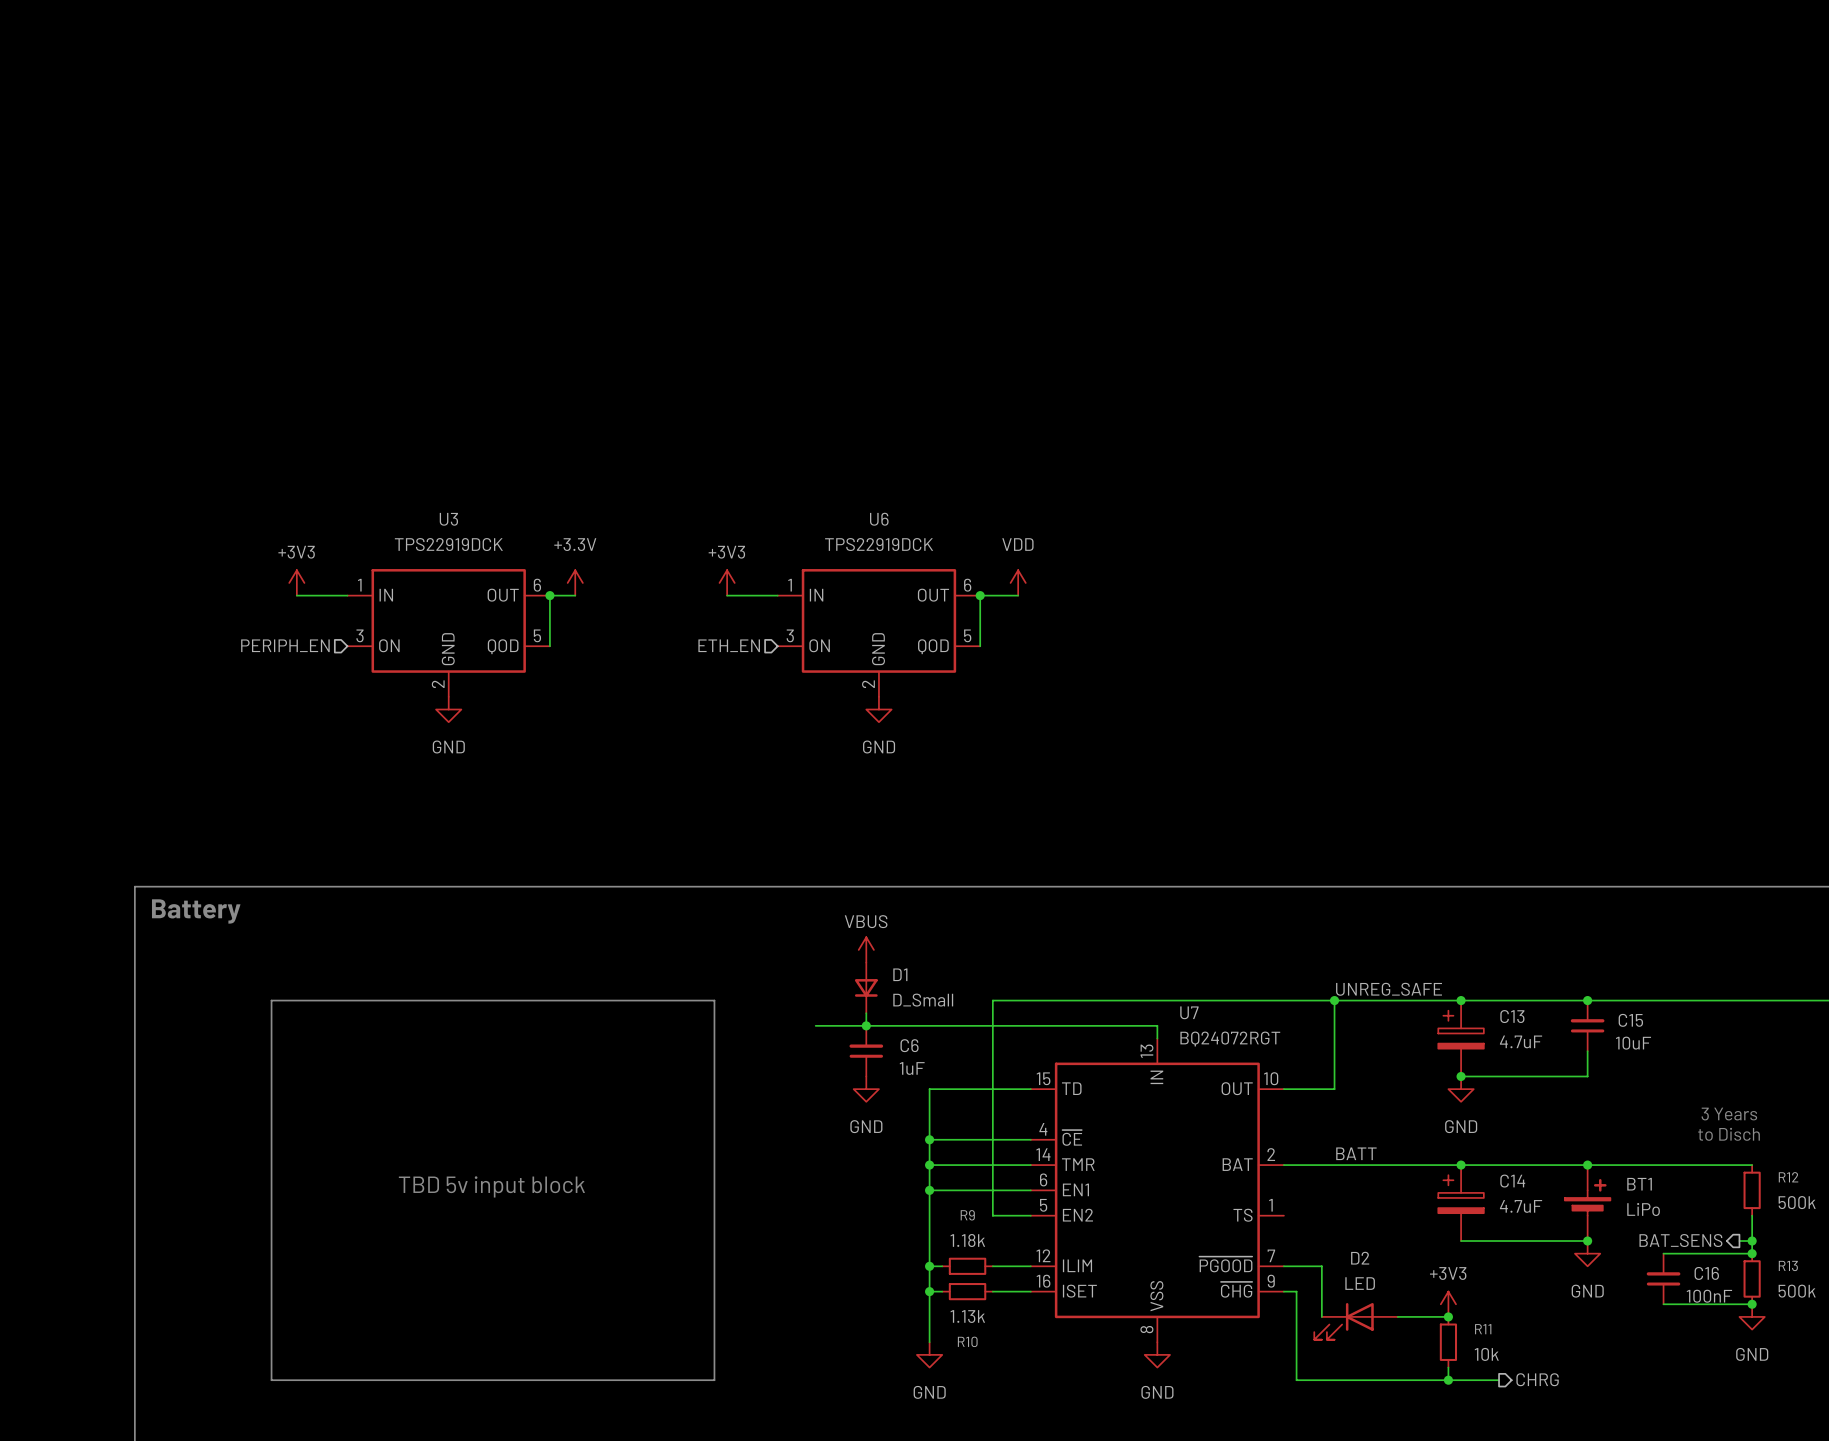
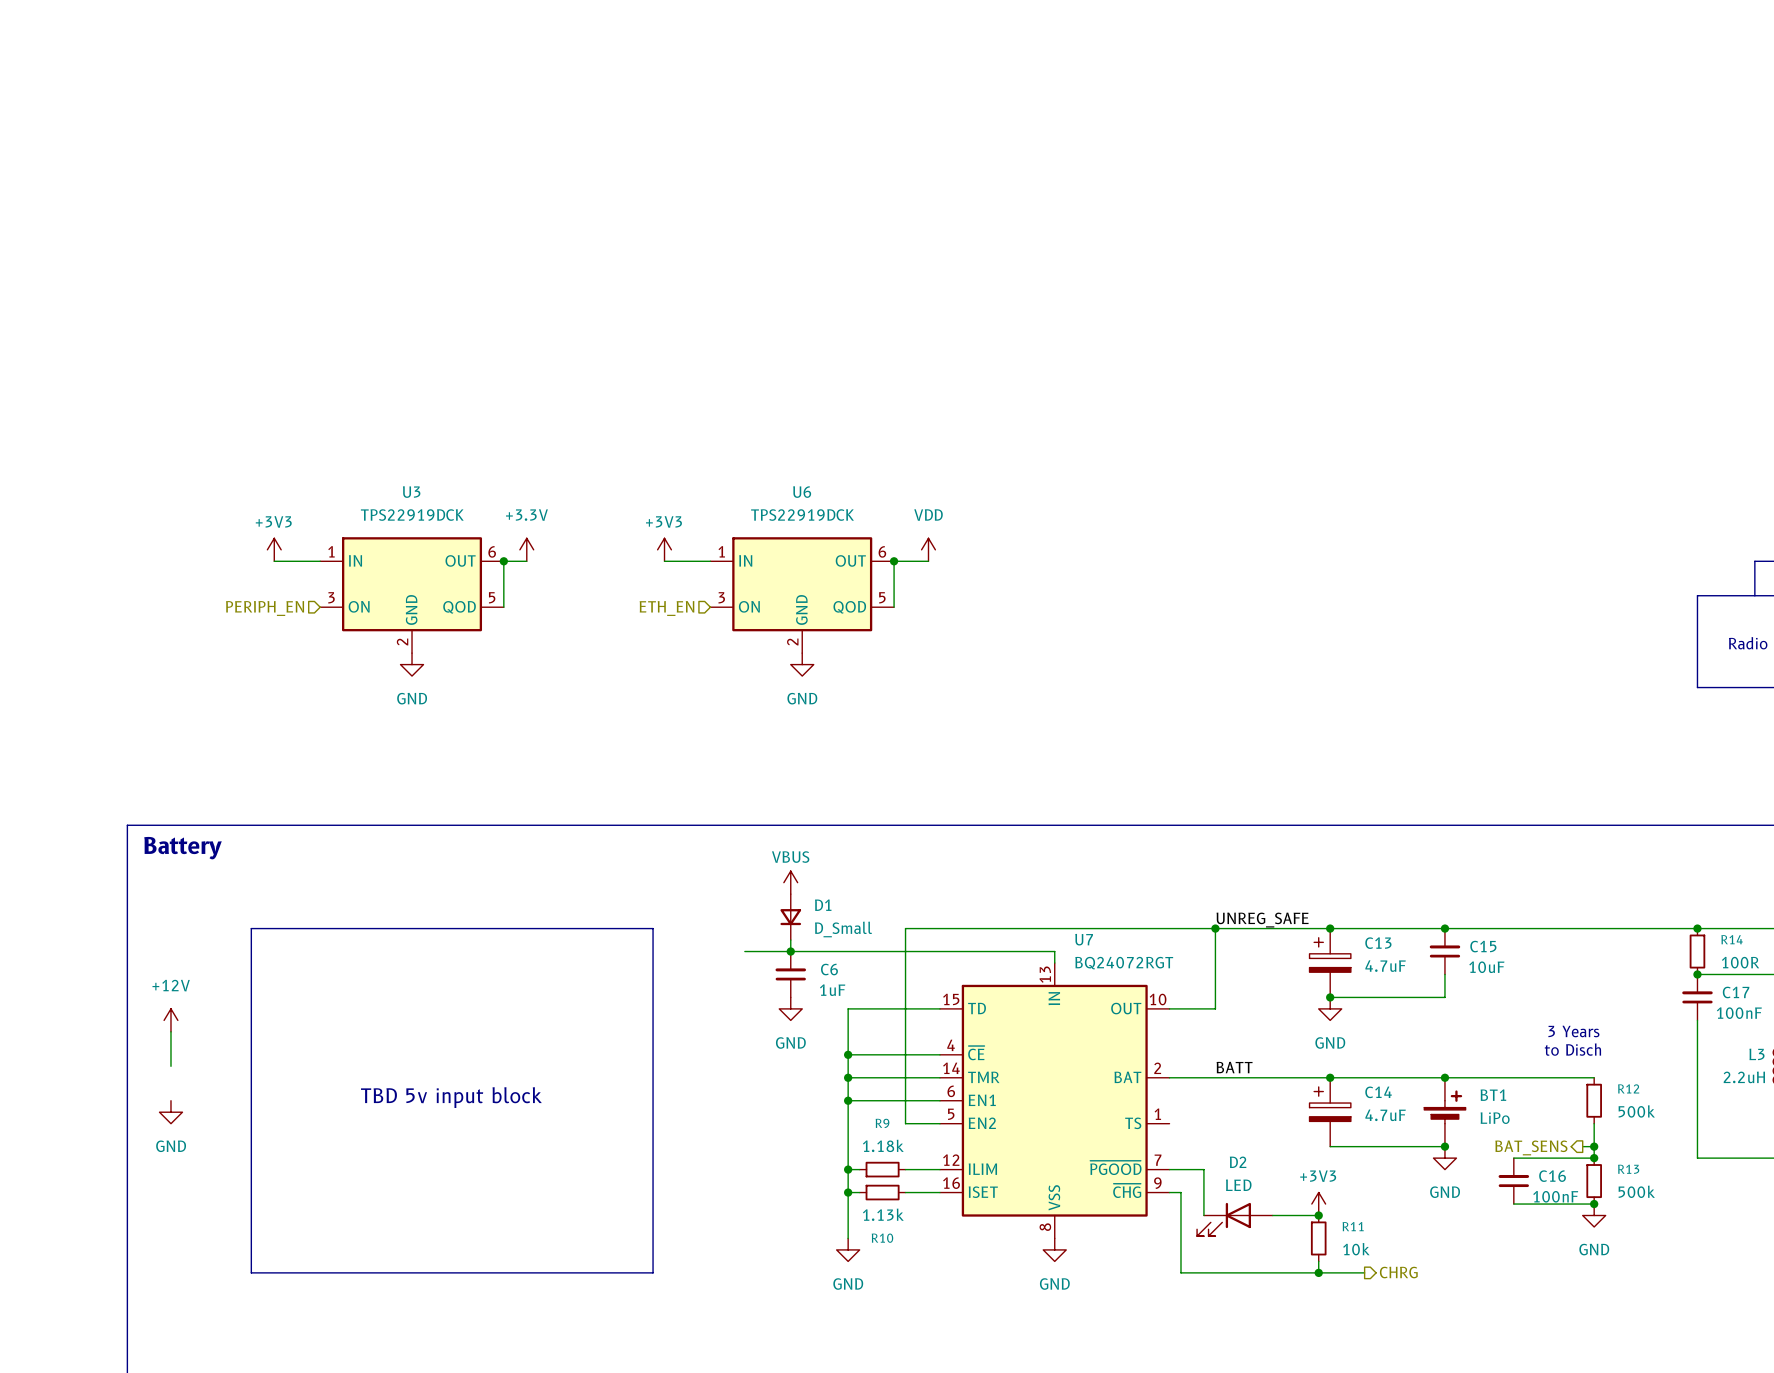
power symbol: none -> +12V (170, 1020)
wire: none -> (170, 1031) (170, 1066)
power symbol: none -> GND (170, 1112)

